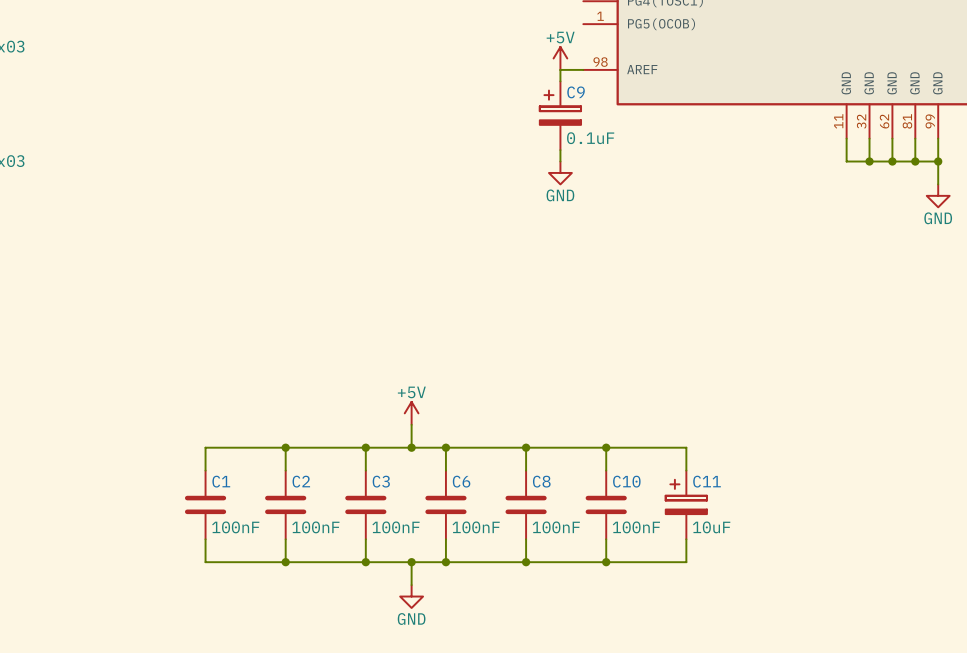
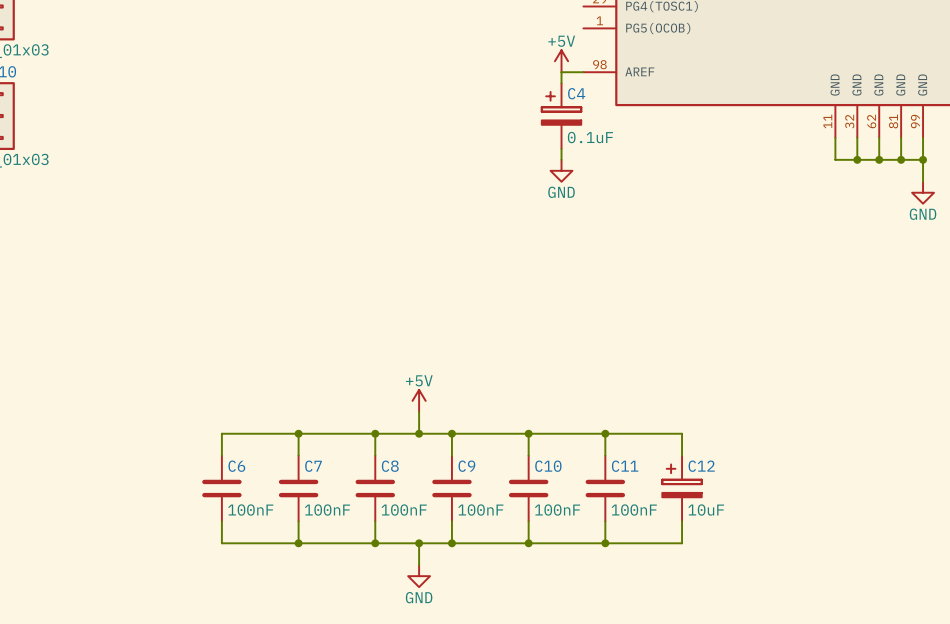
C9 name: C9 (576, 92) -> C4 (576, 93)
C1 name: C1 (221, 481) -> C6 (236, 466)
C2 name: C2 (301, 481) -> C7 (313, 466)
C3 name: C3 (381, 481) -> C8 (390, 466)
C6 name: C6 (461, 481) -> C9 (466, 466)
C8 name: C8 (541, 481) -> C10 (548, 466)
C10 name: C10 (626, 481) -> C11 (625, 466)
C11 name: C11 (707, 481) -> C12 (701, 466)

